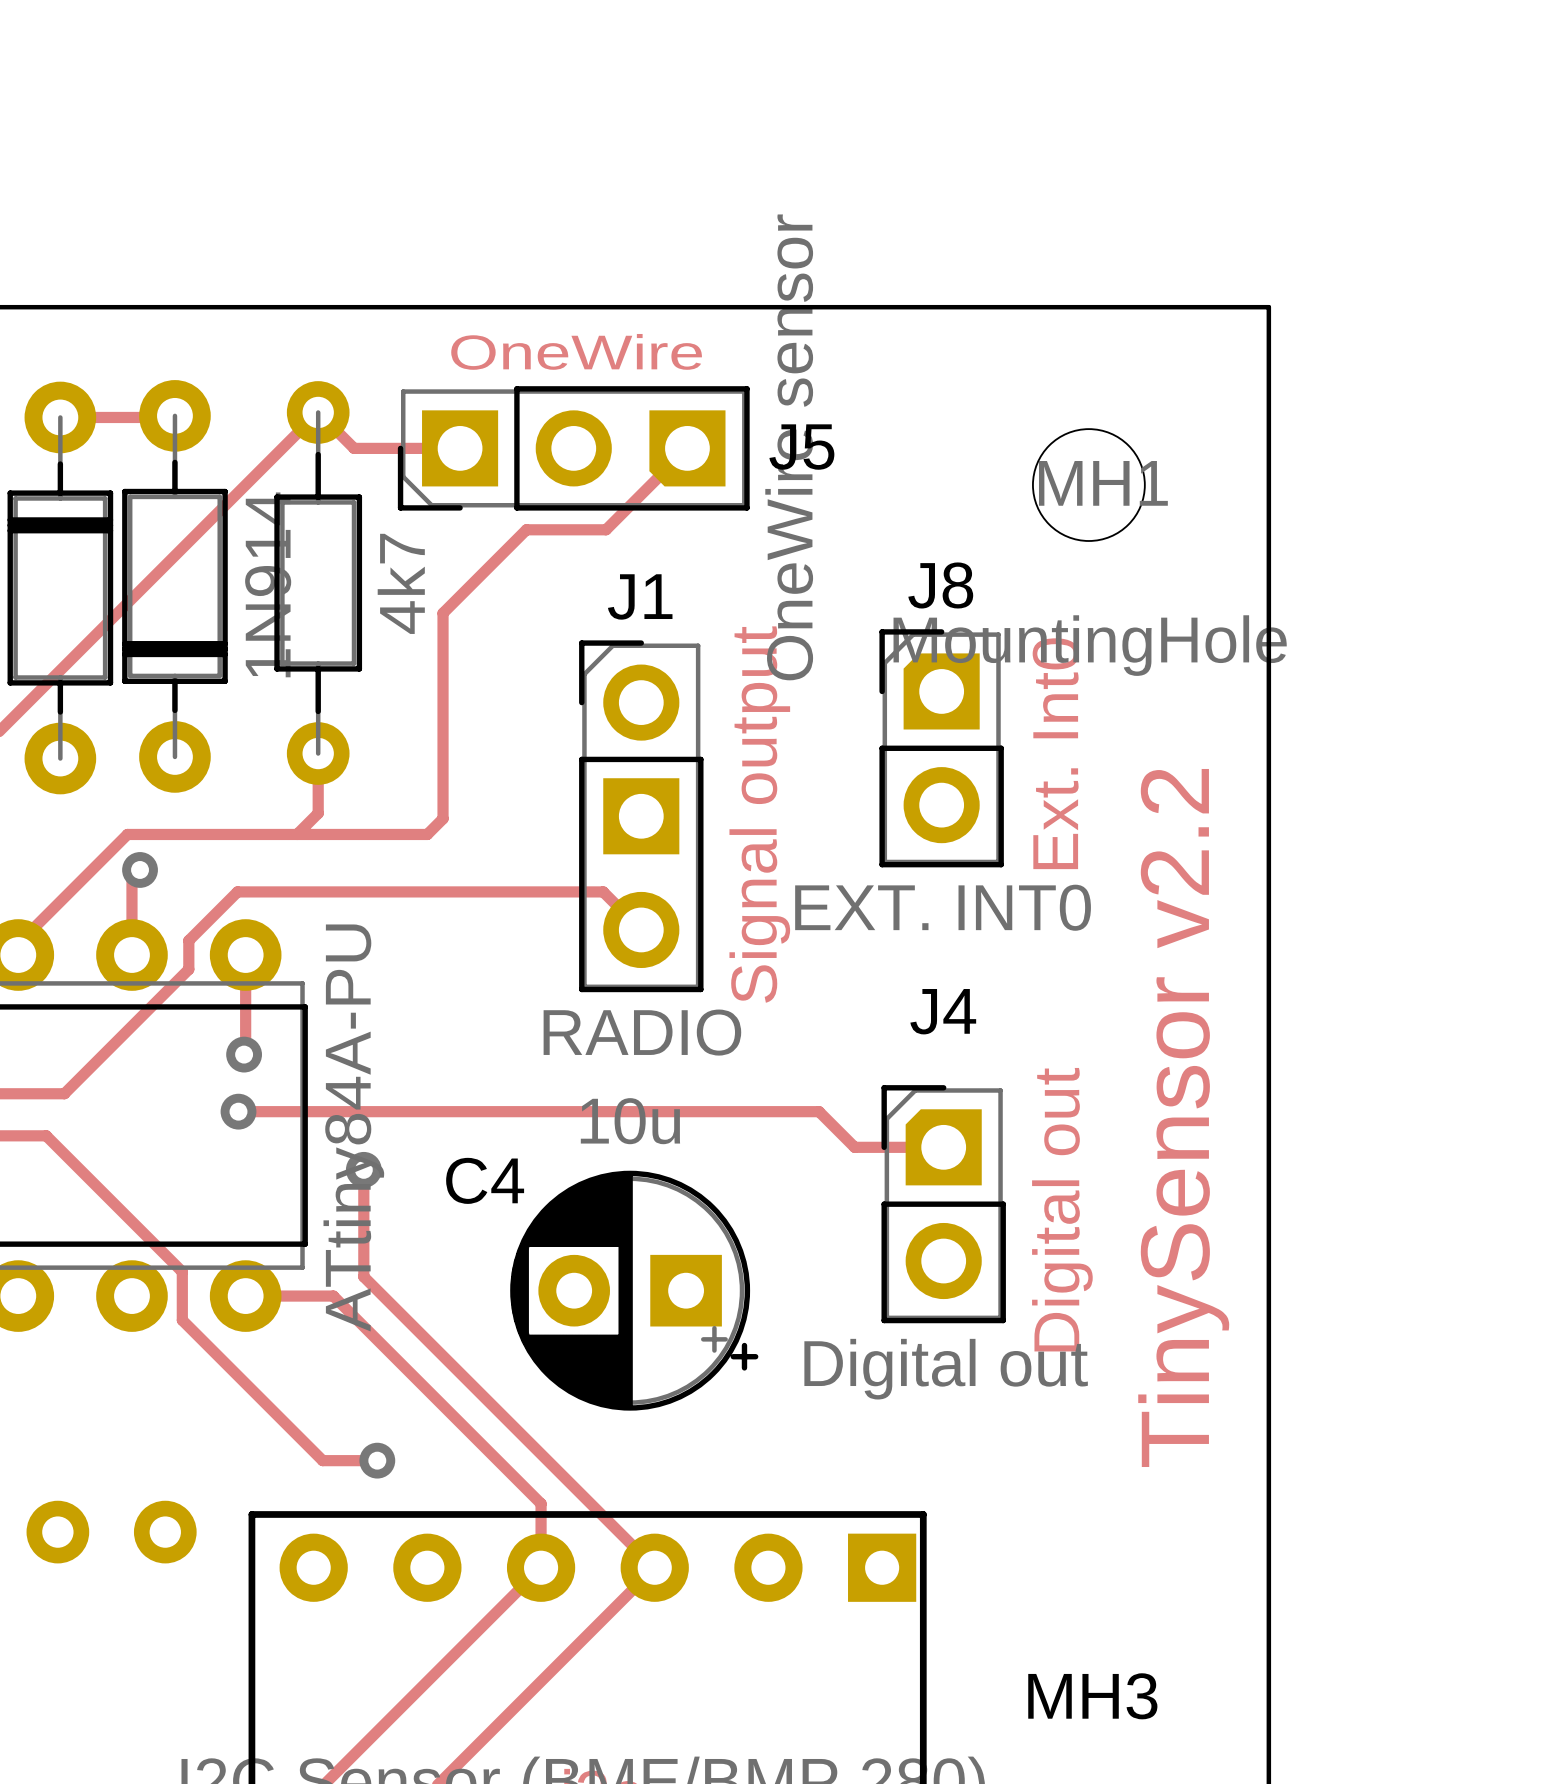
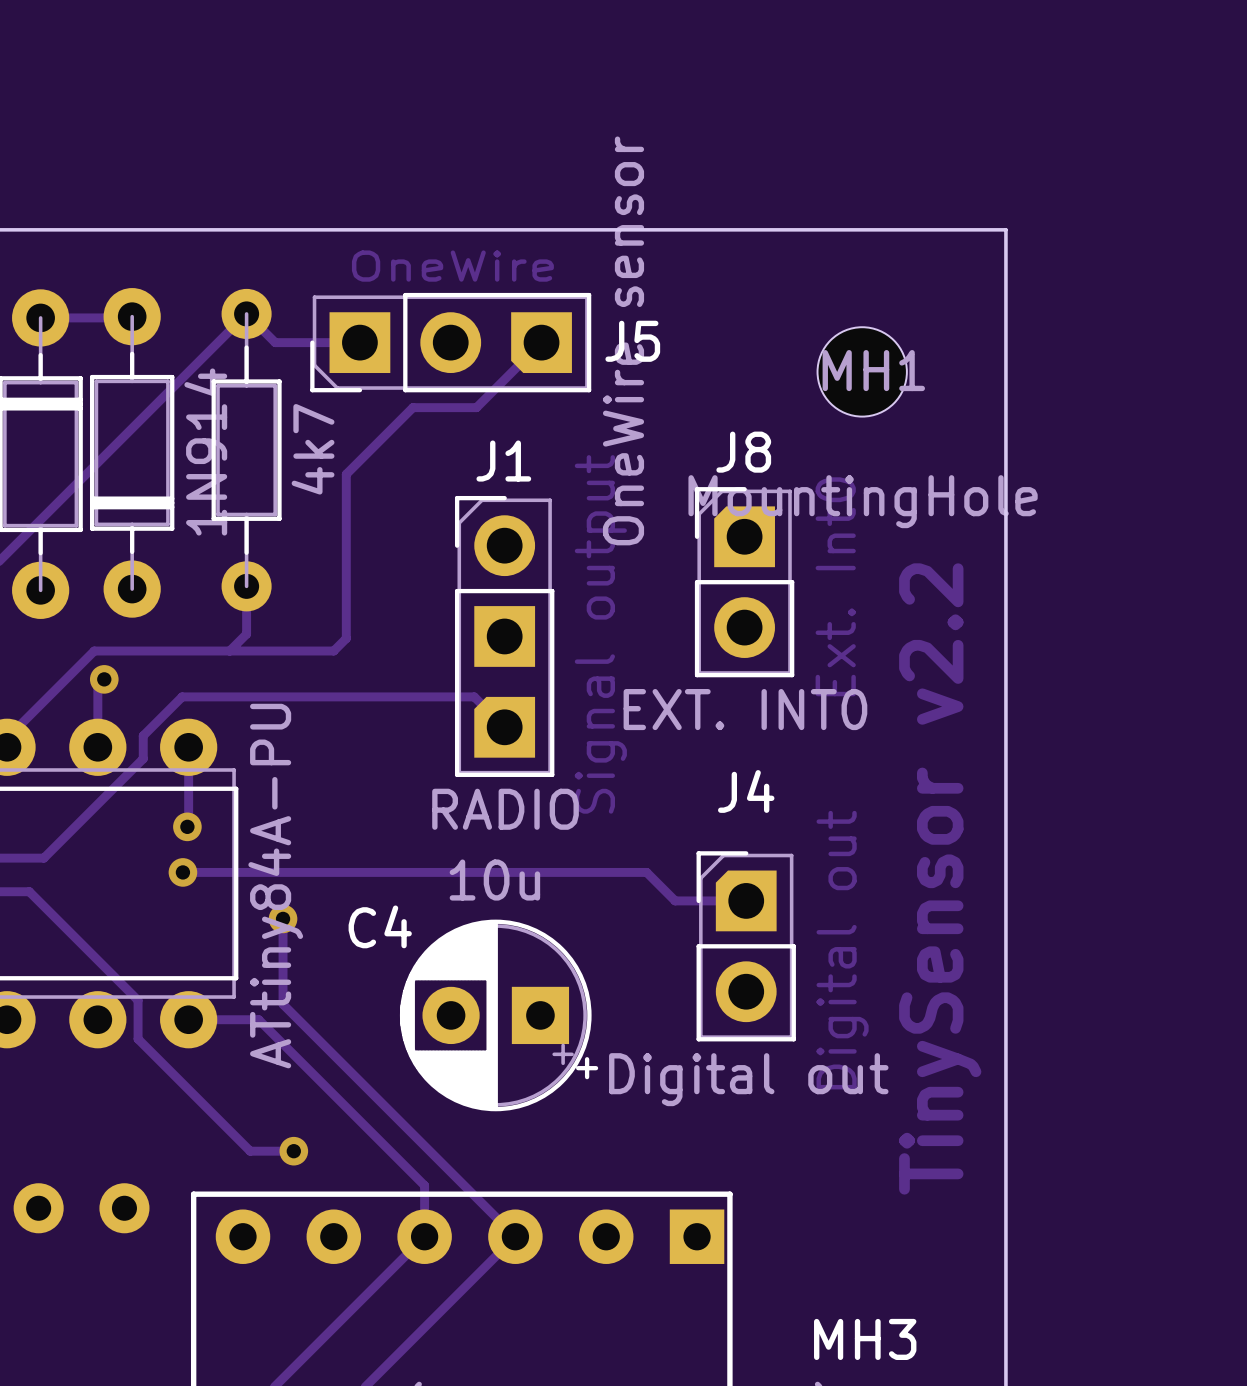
J1 footprint: [579, 640, 704, 993] -> [454, 495, 555, 777]

